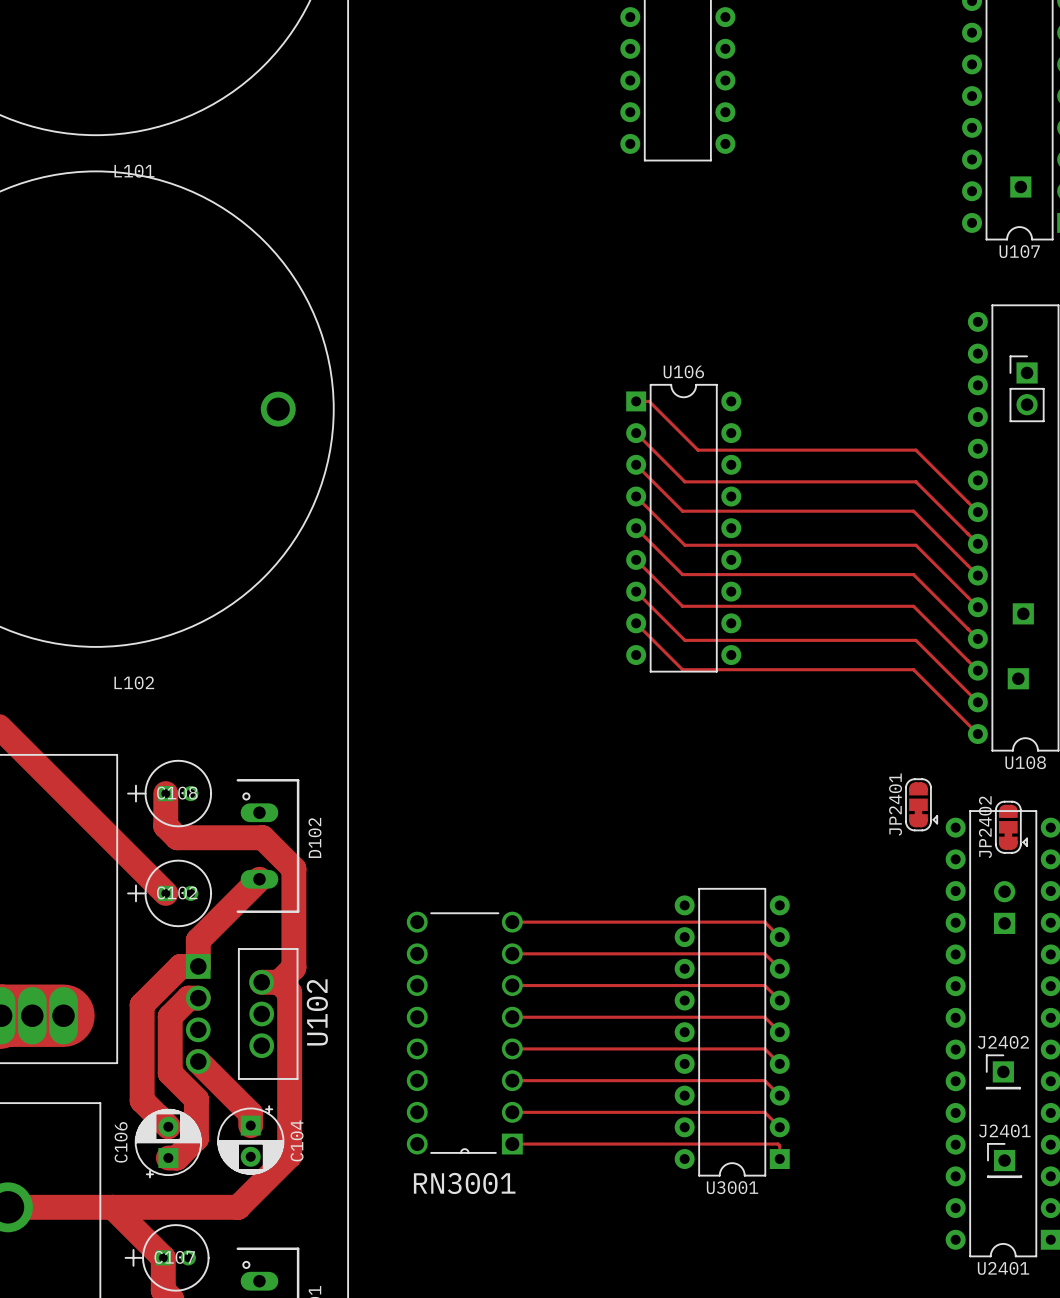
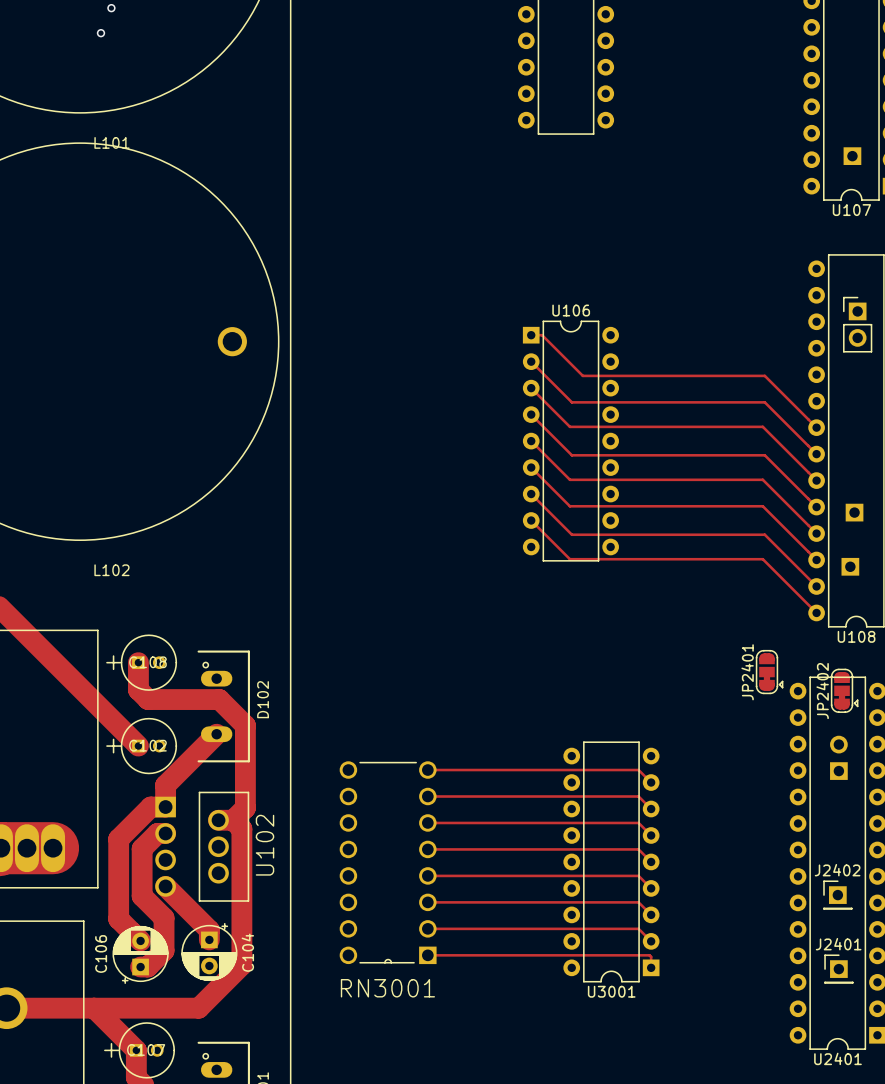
via: none -> (111, 8)
via: none -> (100, 33)

